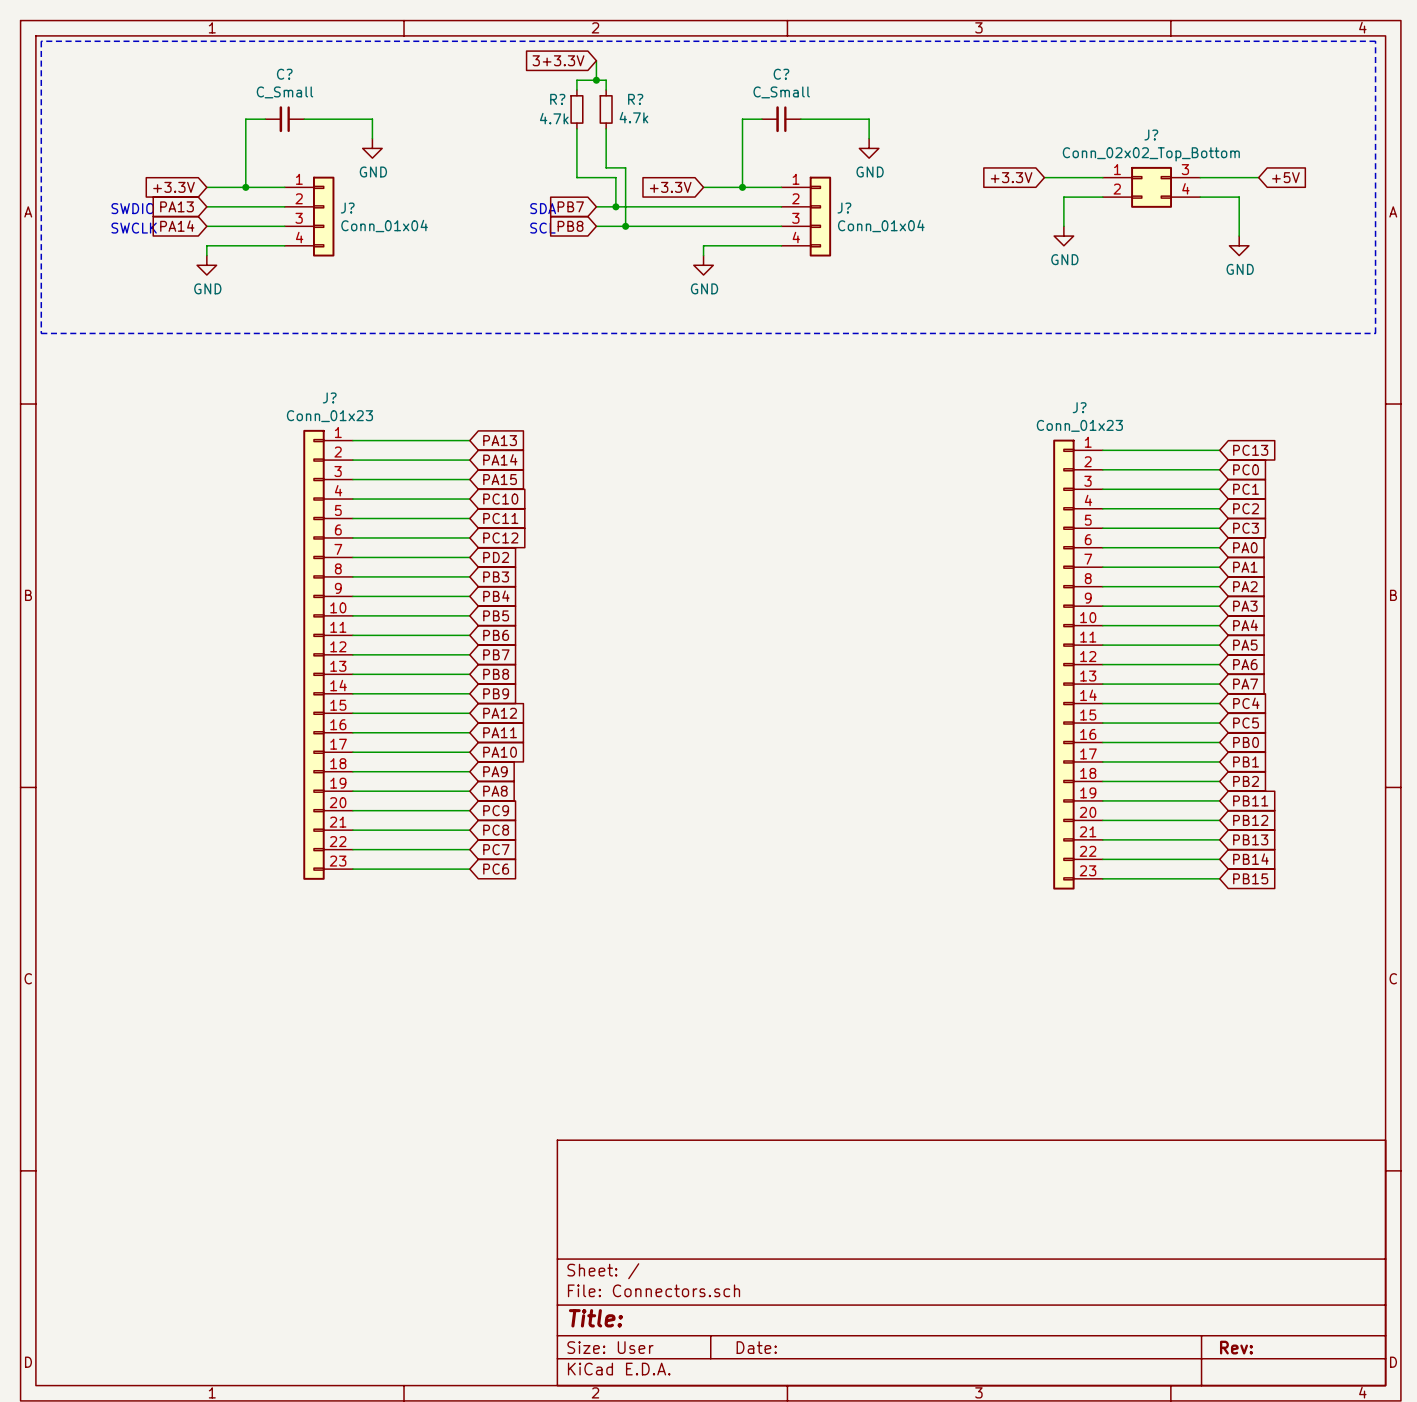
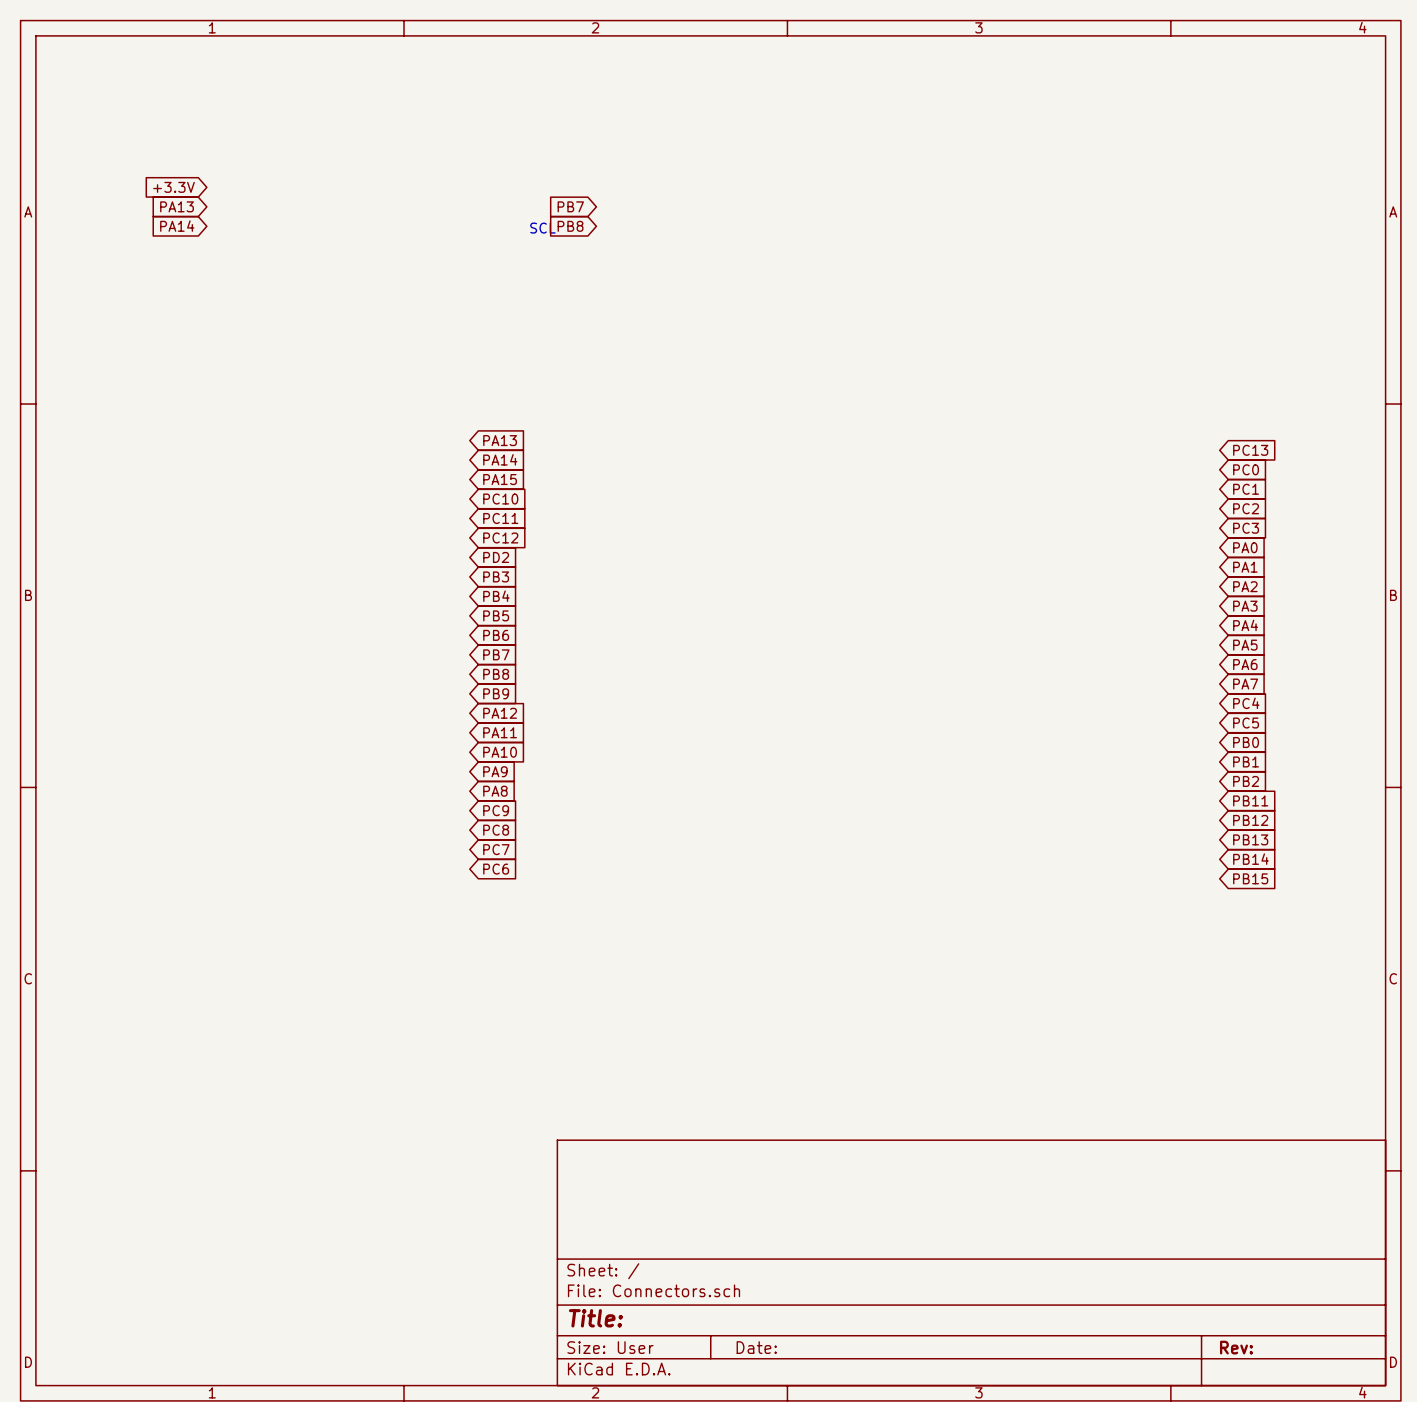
line: (41, 41) (1375, 41) (1375, 333) (41, 333) (41, 41) -> none
global label: 3+3.3V (558, 60) -> none
wire: (596, 60) (596, 80) -> none
junction: (596, 80) -> none
wire: (576, 89) (576, 80) (606, 80) (606, 89) -> none
R?: 4.7k (576, 109) -> none
R?: 4.7k (606, 109) -> none
wire: (265, 119) (245, 119) (245, 187) -> none
C?: C_Small (284, 119) -> none
wire: (304, 119) (372, 119) (372, 138) -> none
wire: (761, 119) (742, 119) (742, 187) -> none
C?: C_Small (781, 119) -> none
wire: (800, 119) (869, 119) (869, 138) -> none
wire: (576, 128) (576, 177) (615, 177) (615, 206) -> none
wire: (606, 128) (606, 167) (625, 167) (625, 226) -> none
power symbol: GND (372, 148) -> none
power symbol: GND (869, 148) -> none
global label: +3.3V (1011, 177) -> none
wire: (1044, 177) (1102, 177) -> none
wire: (1200, 177) (1258, 177) -> none
global label: +5V (1285, 177) -> none
wire: (206, 187) (284, 187) -> none
junction: (245, 187) -> none
global label: +3.3V (670, 187) -> none
wire: (703, 187) (781, 187) -> none
junction: (742, 187) -> none
J?: Conn_02x02_Top_Bottom (1151, 187) -> none
wire: (1102, 197) (1063, 197) (1063, 226) -> none
wire: (1200, 197) (1239, 197) (1239, 236) -> none
wire: (206, 206) (284, 206) -> none
wire: (596, 206) (781, 206) -> none
junction: (615, 206) -> none
text: SWDIO (132, 208) -> none
text: SDA (543, 208) -> none
J?: Conn_01x04 (309, 216) -> none
J?: Conn_01x04 (806, 216) -> none
wire: (206, 226) (284, 226) -> none
wire: (596, 226) (781, 226) -> none
junction: (625, 226) -> none
text: SWCLK (134, 228) -> none
power symbol: GND (1063, 236) -> none
wire: (284, 245) (206, 245) (206, 255) -> none
wire: (781, 245) (703, 245) (703, 255) -> none
power symbol: GND (1239, 245) -> none
power symbol: GND (206, 265) -> none
power symbol: GND (703, 265) -> none
wire: (352, 440) (469, 440) -> none
wire: (1102, 450) (1219, 450) -> none
wire: (352, 460) (469, 460) -> none
wire: (1102, 469) (1219, 469) -> none
wire: (352, 479) (469, 479) -> none
wire: (1102, 489) (1219, 489) -> none
wire: (352, 499) (469, 499) -> none
wire: (1102, 508) (1219, 508) -> none
wire: (352, 518) (469, 518) -> none
wire: (1102, 528) (1219, 528) -> none
wire: (352, 537) (469, 537) -> none
wire: (1102, 547) (1219, 547) -> none
wire: (352, 557) (469, 557) -> none
wire: (1102, 567) (1219, 567) -> none
wire: (352, 576) (469, 576) -> none
wire: (1102, 586) (1219, 586) -> none
wire: (352, 596) (469, 596) -> none
wire: (1102, 606) (1219, 606) -> none
wire: (352, 615) (469, 615) -> none
wire: (1102, 625) (1219, 625) -> none
wire: (352, 635) (469, 635) -> none
wire: (1102, 645) (1219, 645) -> none
J?: Conn_01x23 (328, 654) -> none
wire: (352, 654) (469, 654) -> none
J?: Conn_01x23 (1078, 664) -> none
wire: (1102, 664) (1219, 664) -> none
wire: (352, 674) (469, 674) -> none
wire: (1102, 684) (1219, 684) -> none
wire: (352, 693) (469, 693) -> none
wire: (1102, 703) (1219, 703) -> none
wire: (352, 713) (469, 713) -> none
wire: (1102, 723) (1219, 723) -> none
wire: (352, 732) (469, 732) -> none
wire: (1102, 742) (1219, 742) -> none
wire: (352, 752) (469, 752) -> none
wire: (1102, 761) (1219, 761) -> none
wire: (352, 771) (469, 771) -> none
wire: (1102, 781) (1219, 781) -> none
wire: (352, 791) (469, 791) -> none
wire: (1102, 800) (1219, 800) -> none
wire: (352, 810) (469, 810) -> none
wire: (1102, 820) (1219, 820) -> none
wire: (352, 830) (469, 830) -> none
wire: (1102, 839) (1219, 839) -> none
wire: (352, 849) (469, 849) -> none
wire: (1102, 859) (1219, 859) -> none
wire: (352, 869) (469, 869) -> none
wire: (1102, 878) (1219, 878) -> none

